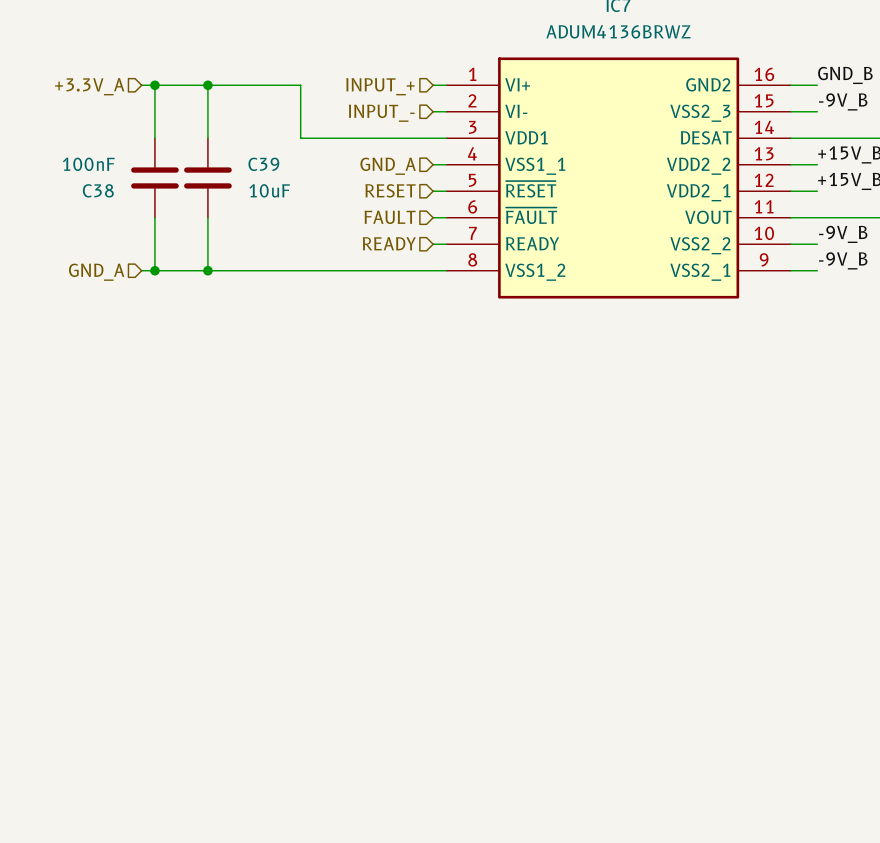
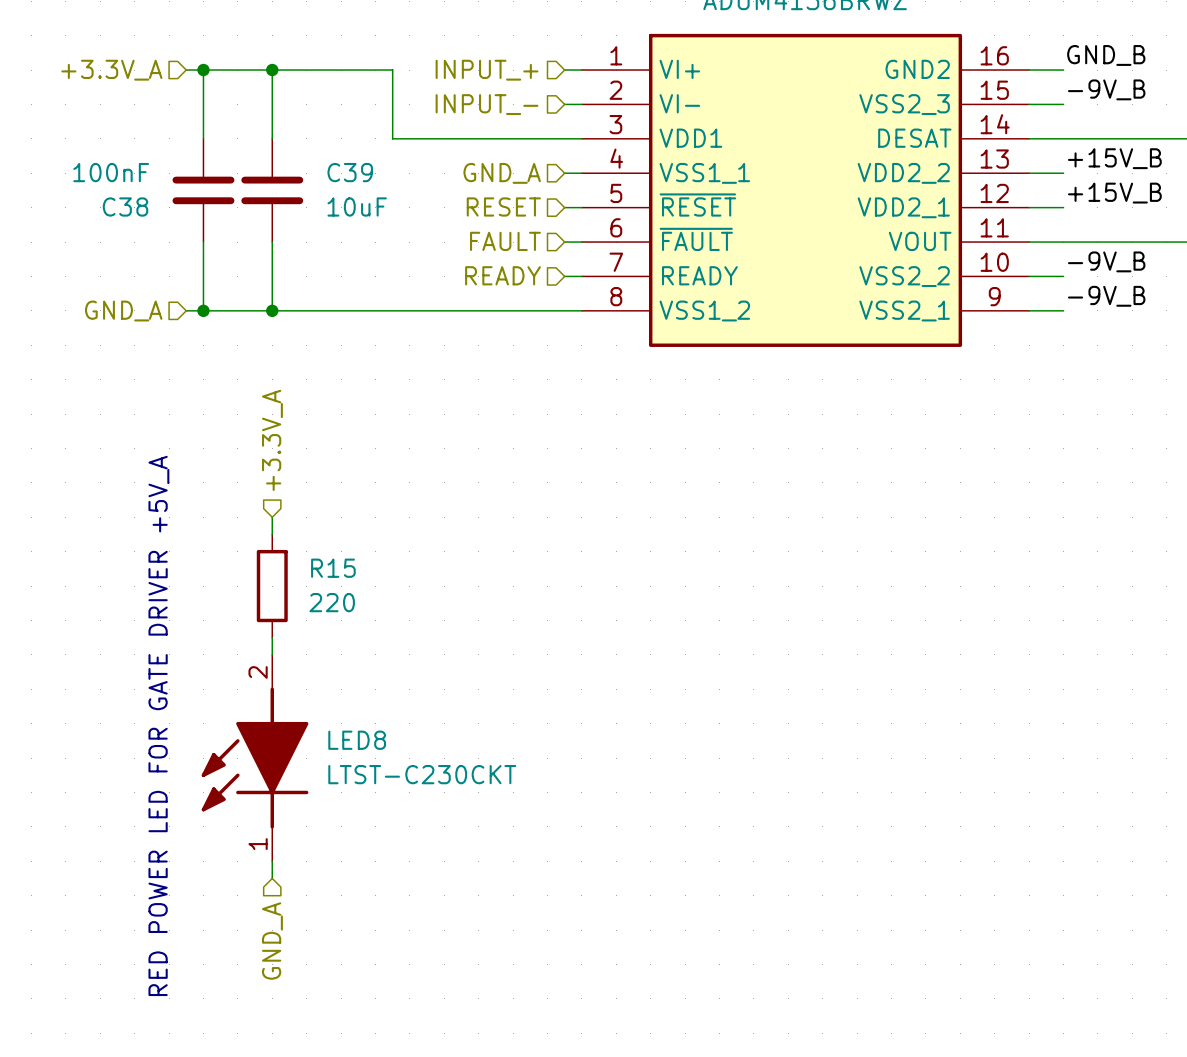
hierarchical label: none -> +3.3V_A (272, 440)
wire: none -> (272, 517) (272, 534)
R15: none -> 220 (272, 586)
wire: none -> (272, 637) (272, 654)
text: none -> RED POWER LED FOR GATE DRIVER +5V_A (158, 725)
LED8: none -> LTST-C230CKT (255, 758)
wire: none -> (272, 861) (272, 878)
hierarchical label: none -> GND_A (272, 941)

